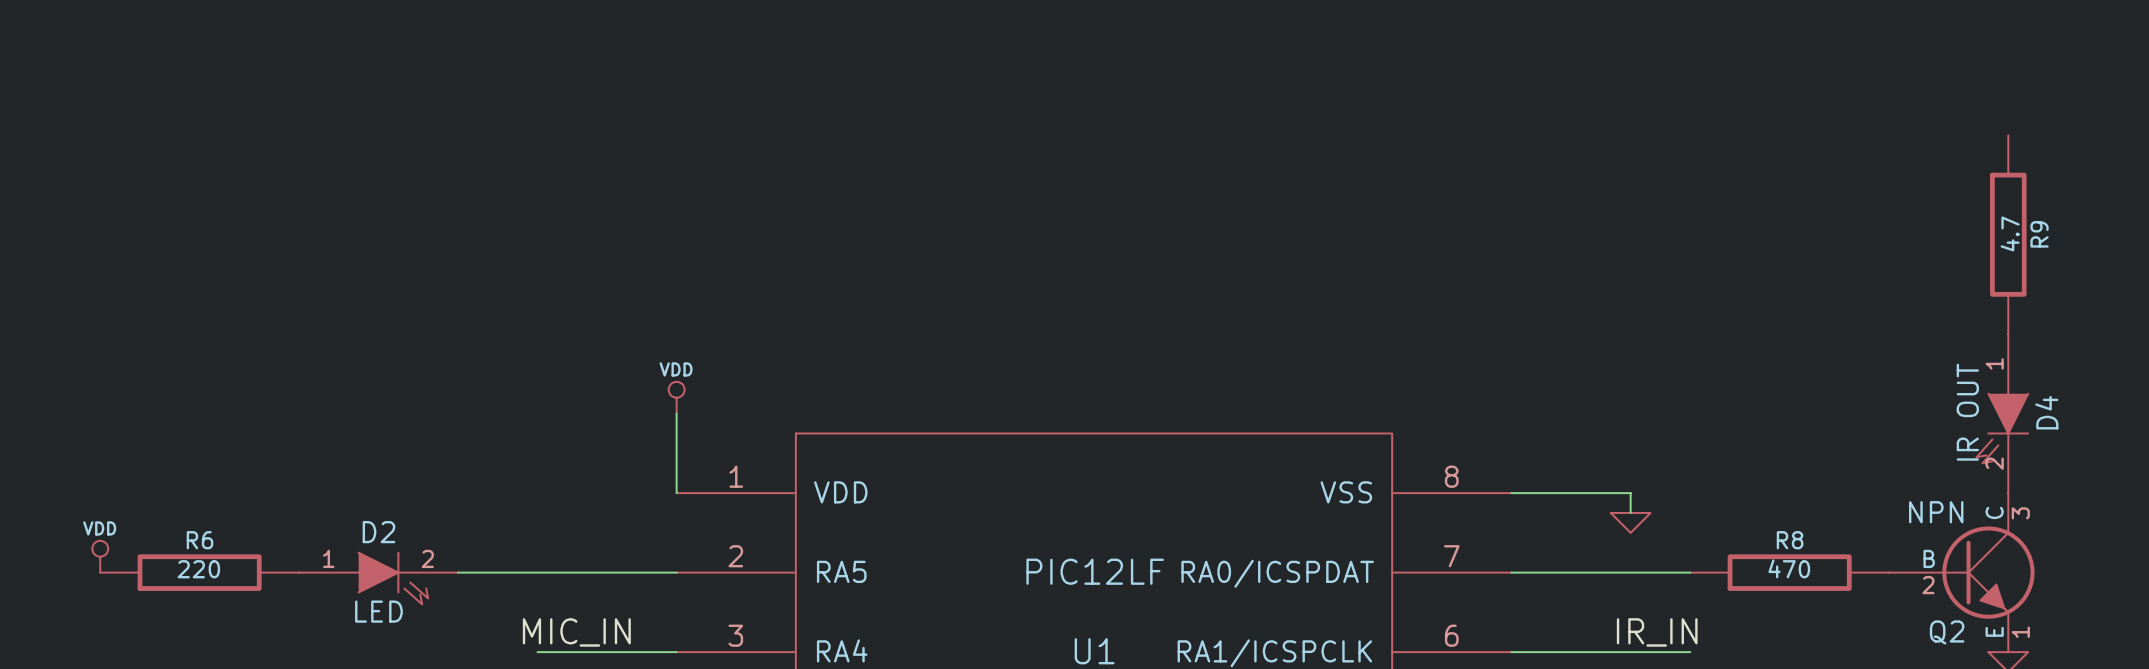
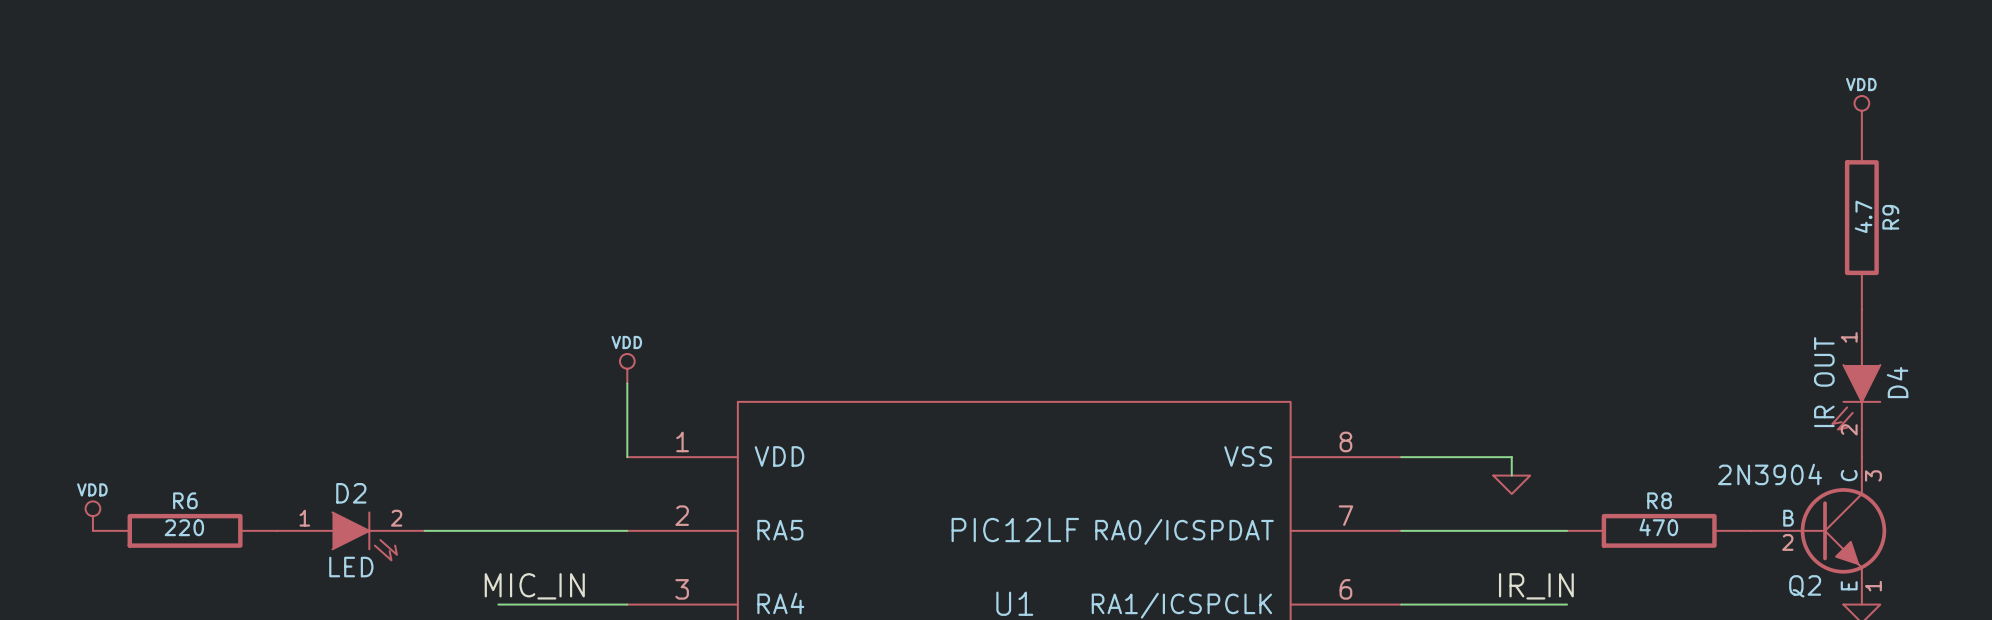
power symbol: none -> VDD (1861, 110)
Q2 value: NPN (1936, 512) -> 2N3904 (1770, 474)

